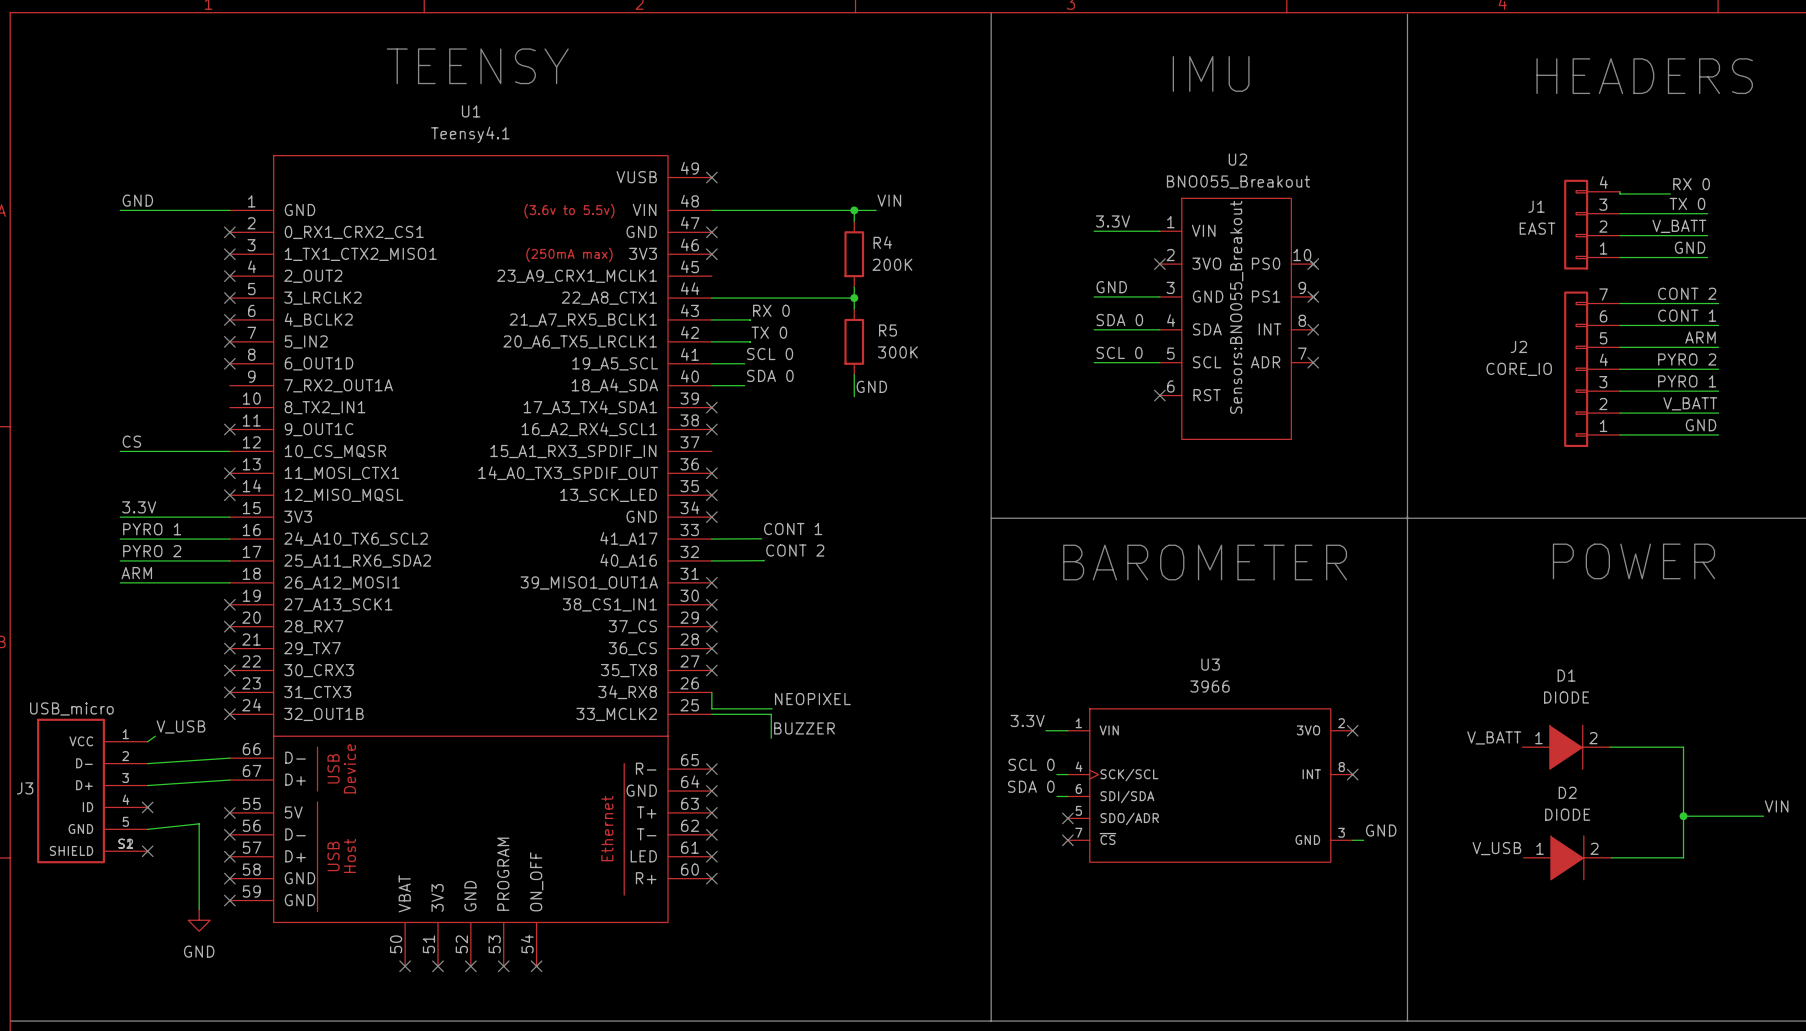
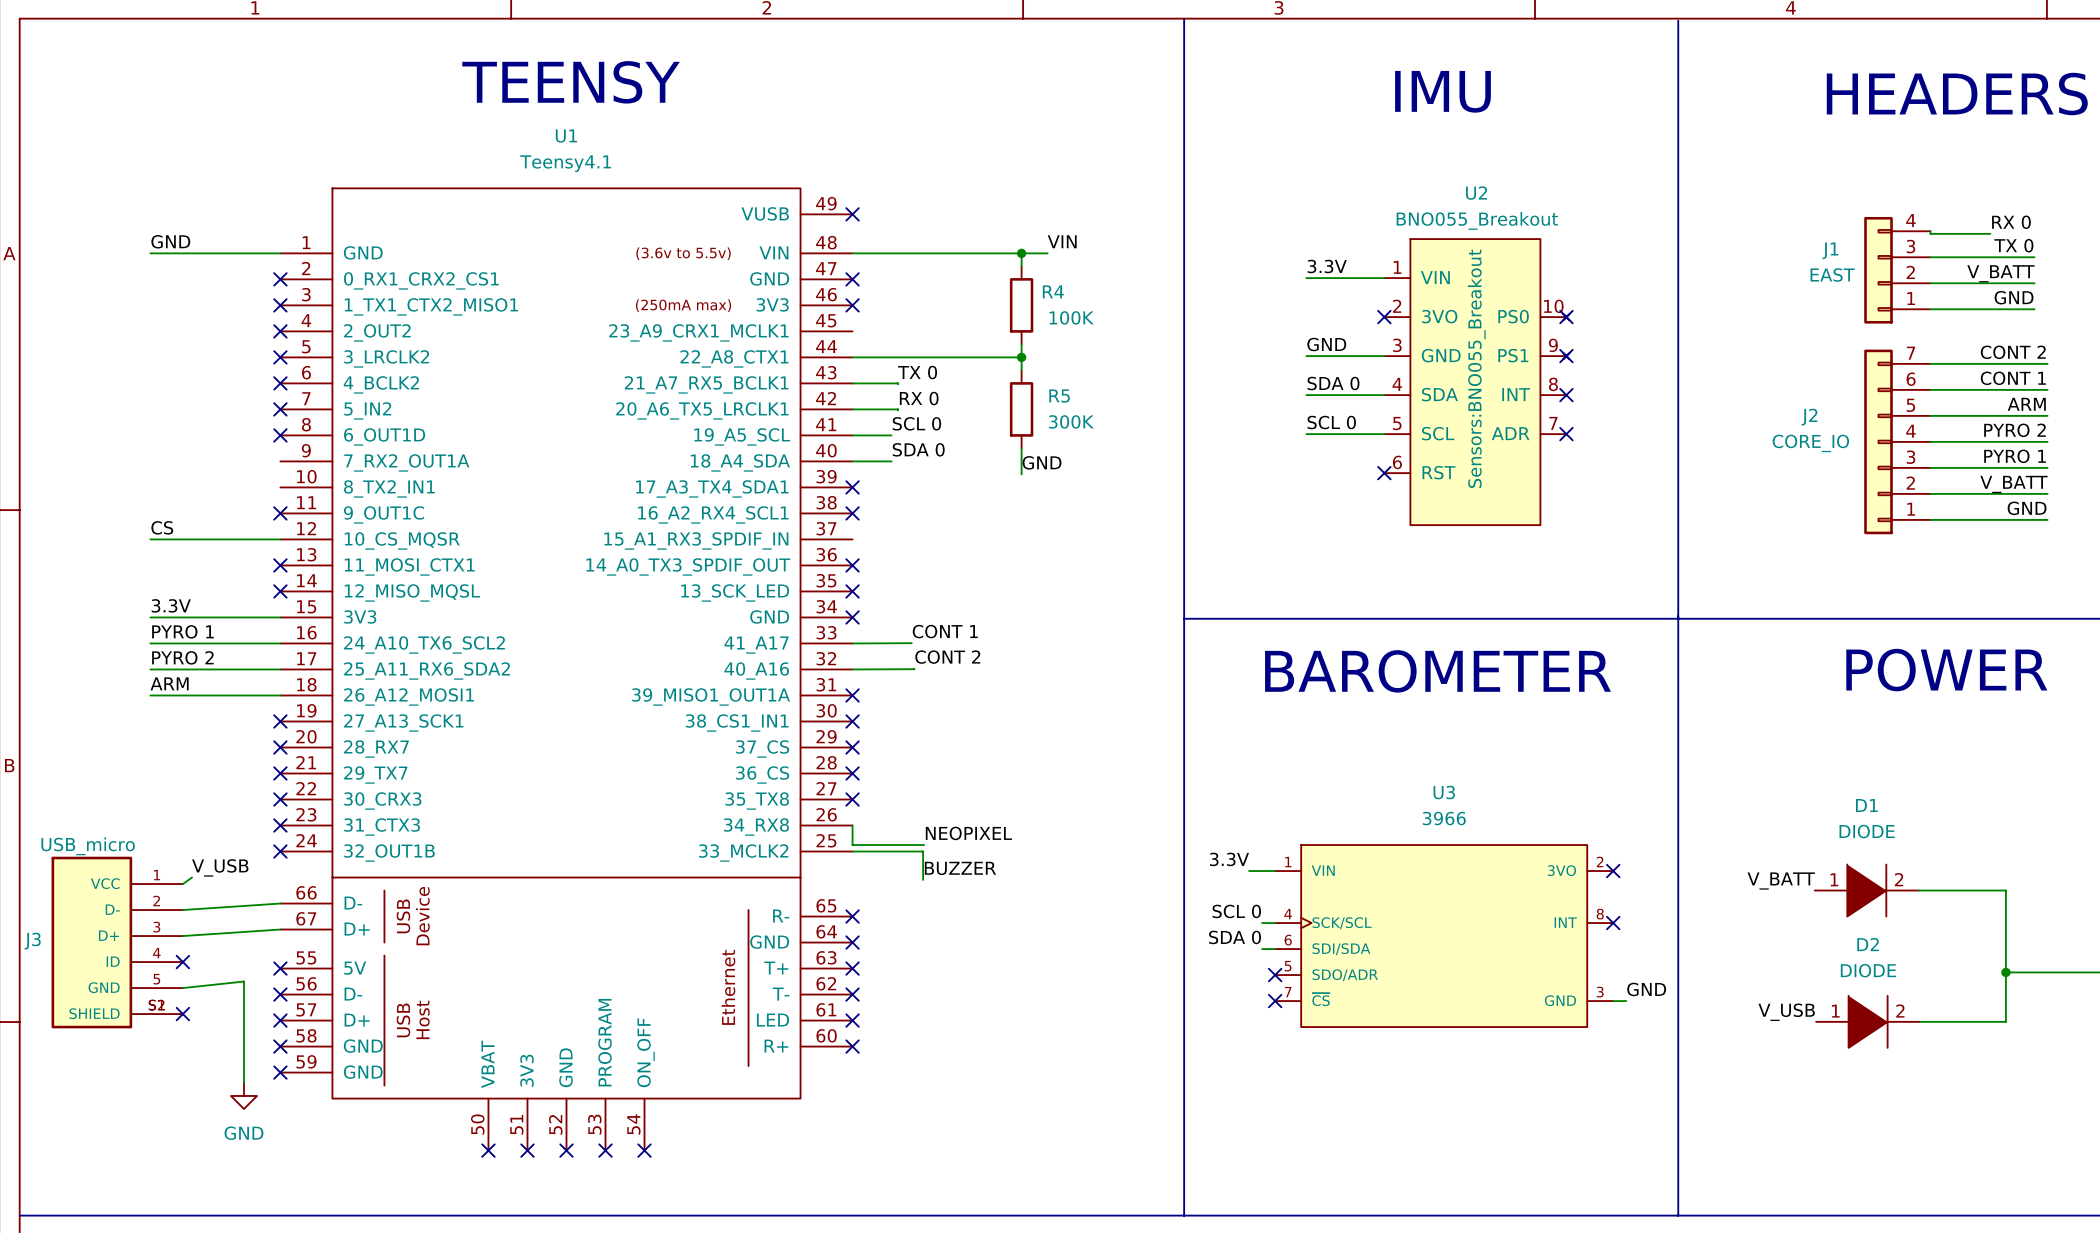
R4 value: 200K (892, 264) -> 100K (1071, 317)
label: RX 0 (771, 310) -> TX 0 (917, 372)
label: TX 0 (769, 332) -> RX 0 (919, 398)

